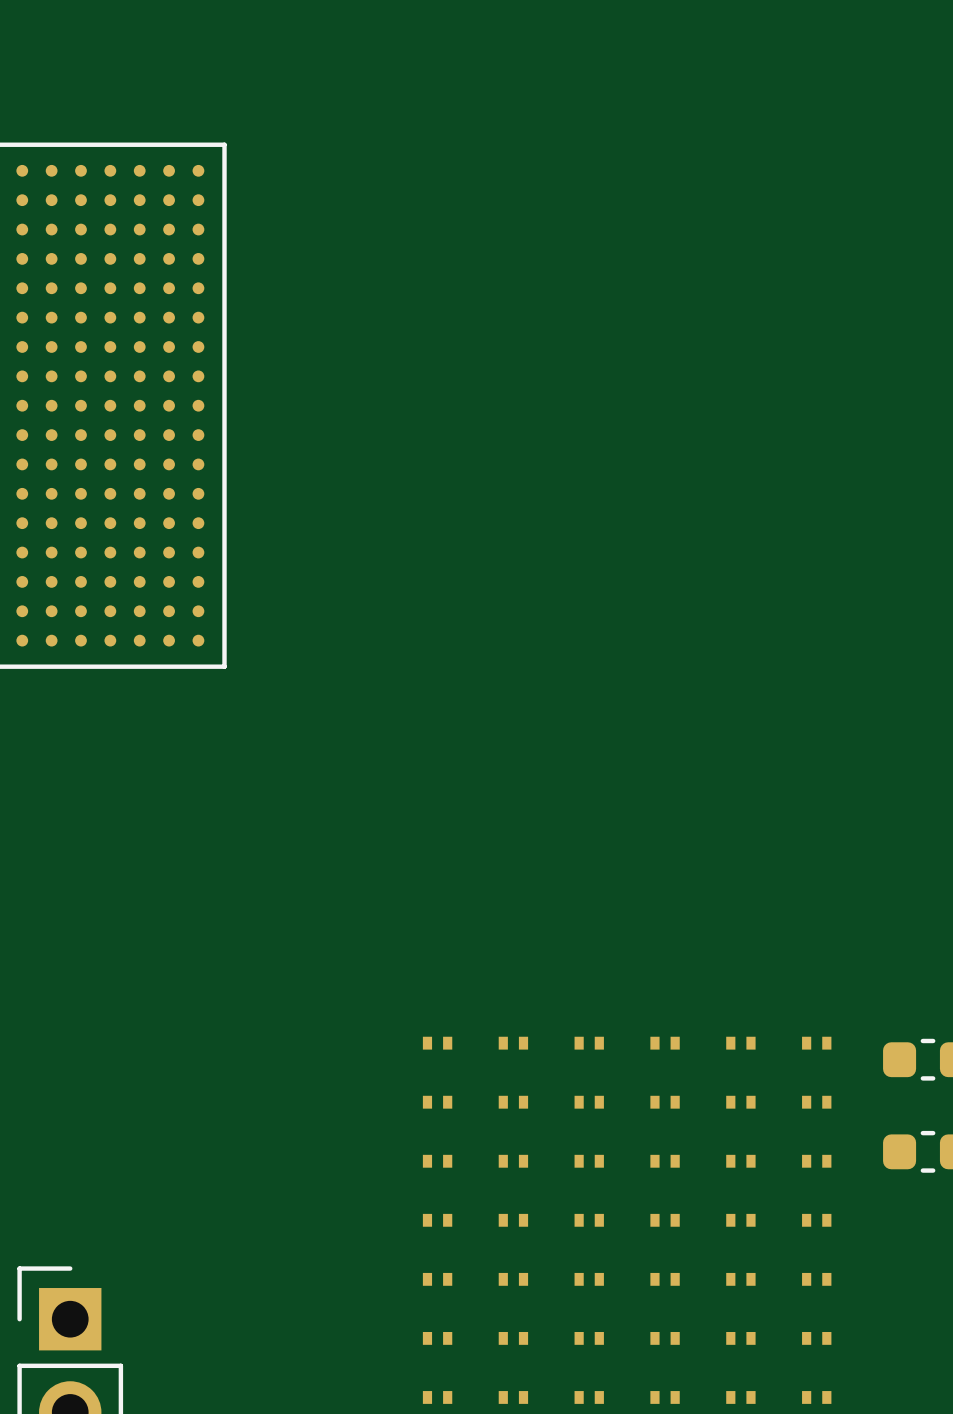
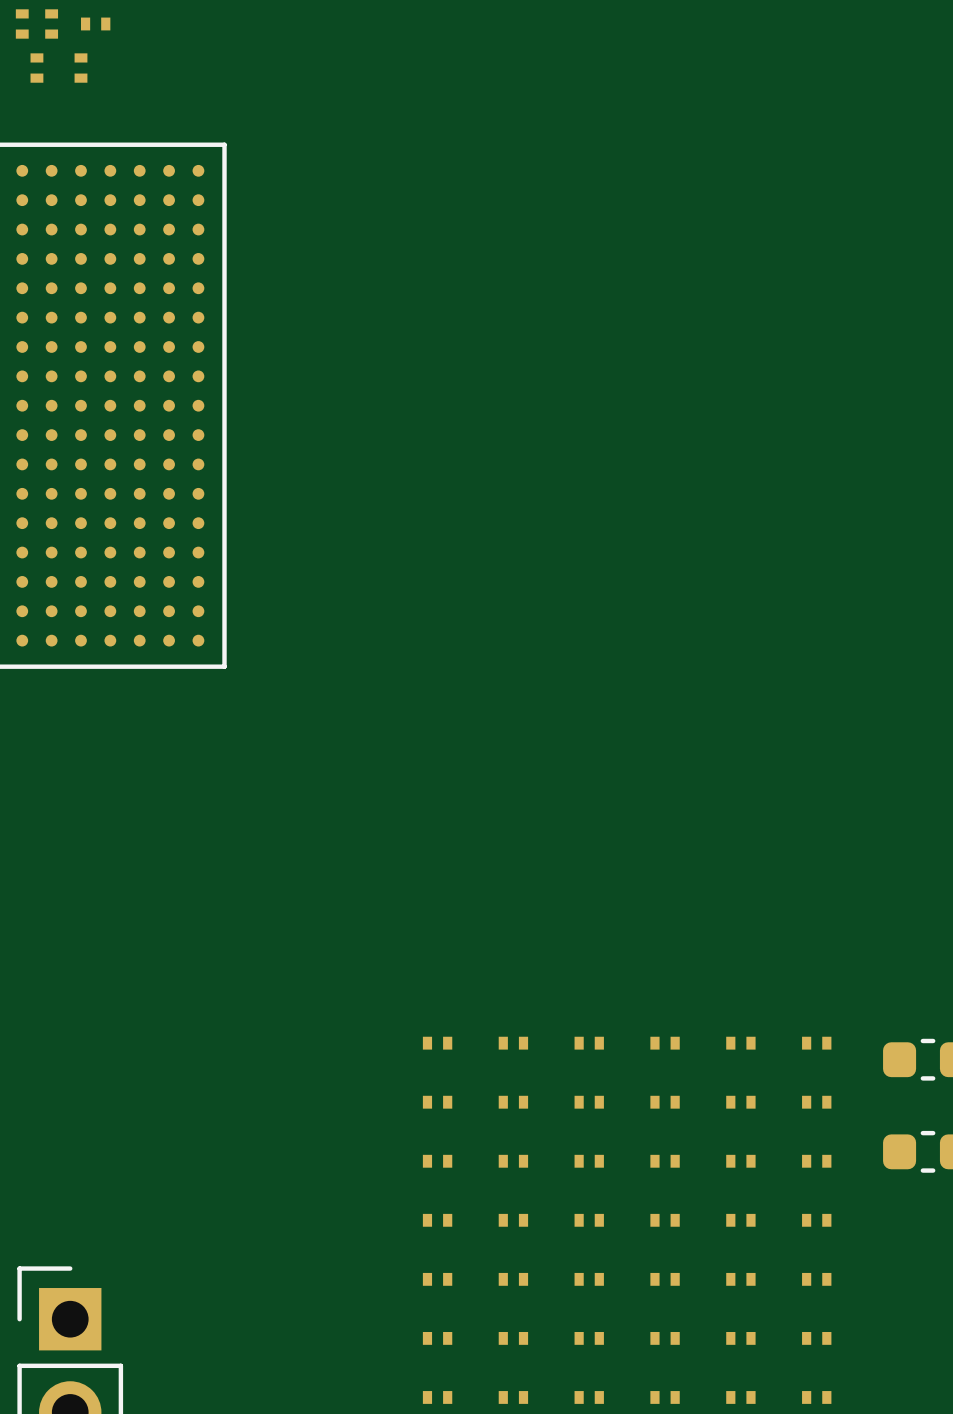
part: none -> (22, 23)
part: none -> (51, 23)
part: none -> (95, 23)
part: none -> (36, 68)
part: none -> (80, 68)

